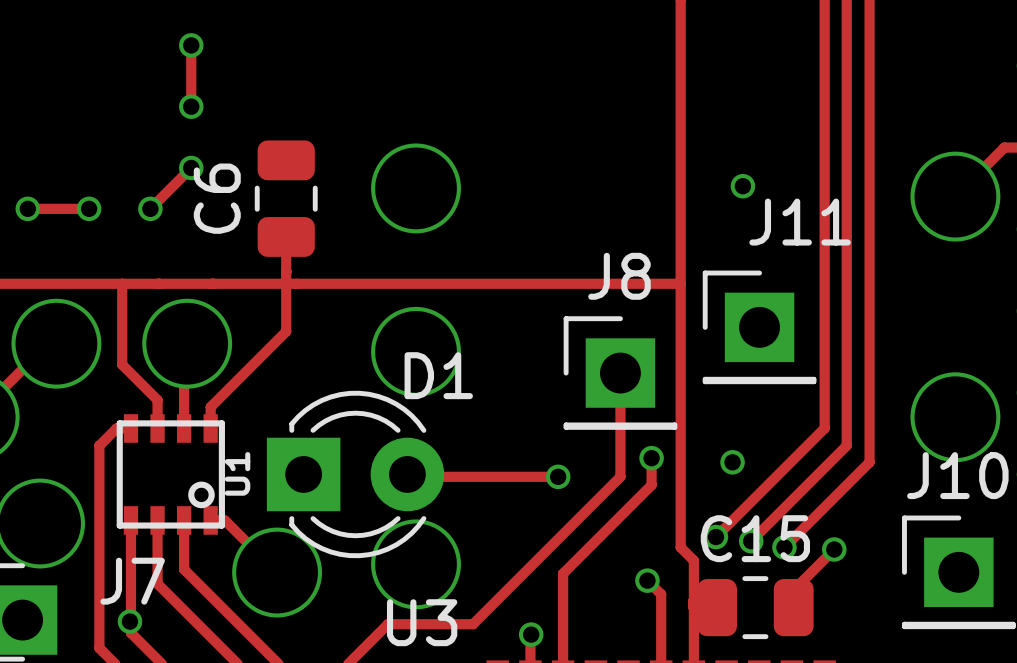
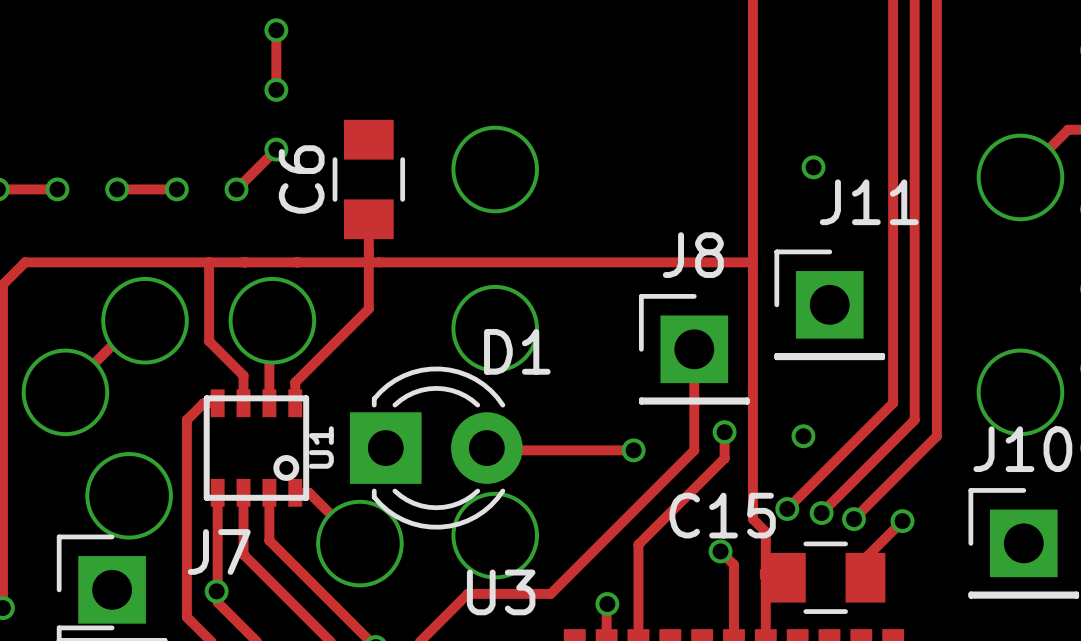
C6 footprint: [254, 140, 318, 257] -> [332, 119, 406, 240]
C15 name position: C15 (755, 538) -> C15 (722, 515)
C15 footprint: [697, 576, 814, 640] -> [766, 541, 886, 614]

